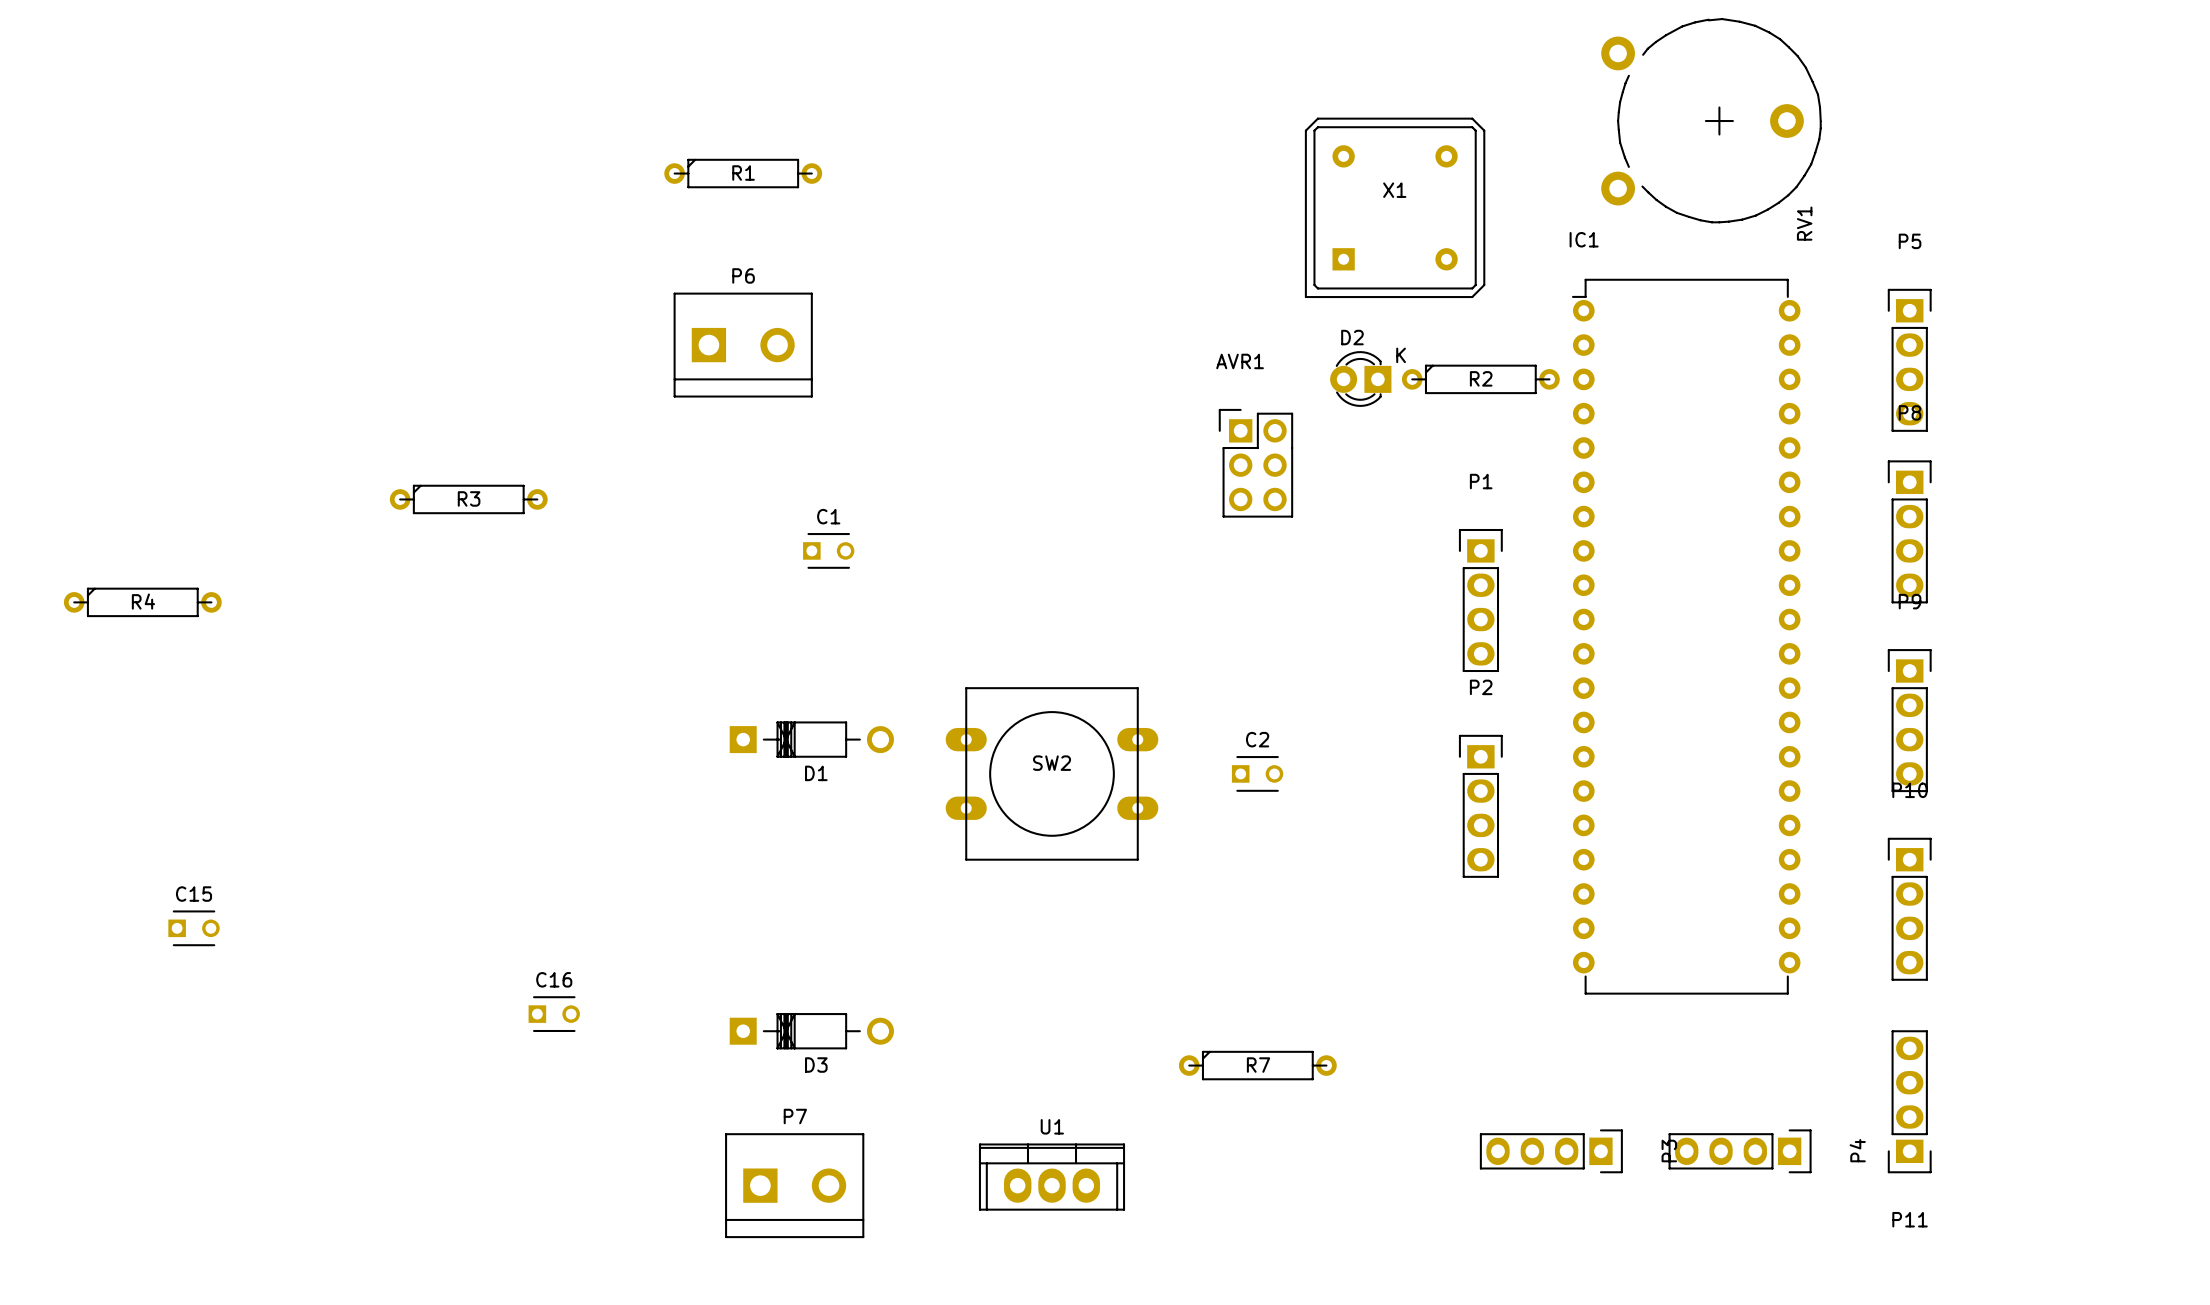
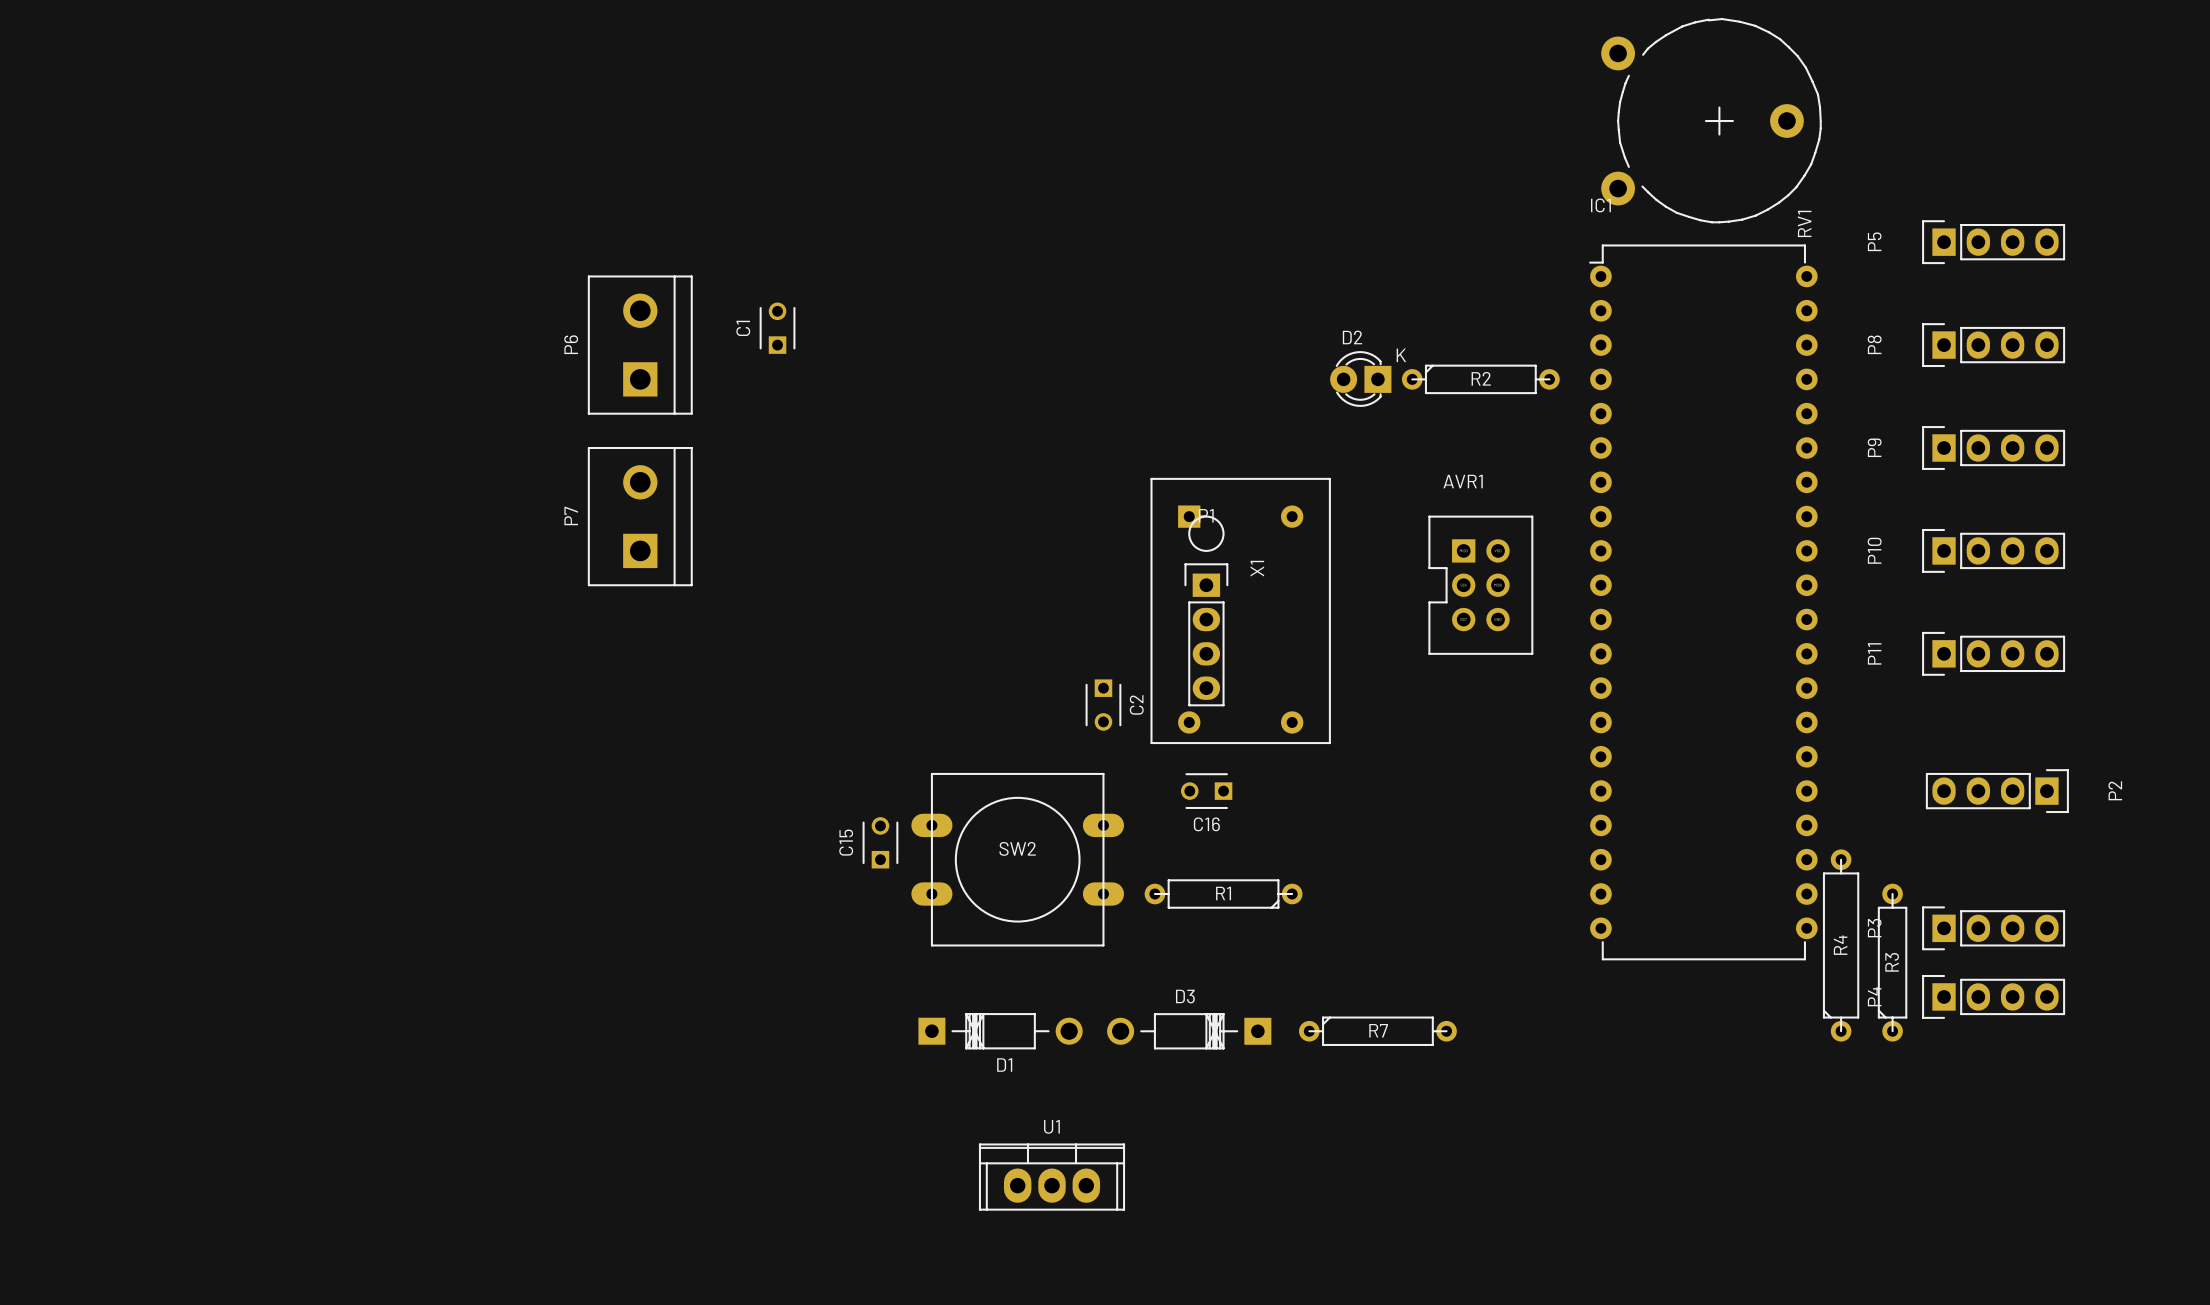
X1 footprint: [1304, 117, 1486, 299] -> [1150, 477, 1331, 745]
R1 rotation: 0° (743, 173) -> 180° (1223, 894)
R1 position: (743, 173) -> (1223, 894)
X1 name position: X1 (1394, 190) -> X1 (1257, 568)
P6 rotation: 0° (743, 345) -> 90° counterclockwise (640, 345)
P6 position: (743, 345) -> (640, 345)
P5 rotation: 0° (1909, 360) -> 90° counterclockwise (1993, 242)
P5 position: (1909, 360) -> (1993, 242)
AVR1 footprint: [1218, 408, 1294, 518] -> [1428, 515, 1534, 655]
R3 rotation: 0° (468, 499) -> 90° counterclockwise (1892, 962)
R3 position: (468, 499) -> (1892, 962)
P8 rotation: 0° (1909, 531) -> 90° counterclockwise (1993, 345)
P8 position: (1909, 531) -> (1993, 345)
C1 rotation: 0° (828, 550) -> 90° counterclockwise (777, 328)
C1 position: (828, 550) -> (777, 328)
R4 footprint: [63, 587, 222, 618] -> [1822, 849, 1860, 1042]
P1 position: (1480, 600) -> (1206, 634)
IC1 position: (1686, 636) -> (1703, 602)
P9 rotation: 0° (1909, 720) -> 90° counterclockwise (1993, 448)
P9 position: (1909, 720) -> (1993, 448)
D1 position: (811, 739) -> (1000, 1031)
SW2 position: (1052, 773) -> (1017, 859)
C2 rotation: 0° (1257, 773) -> 90° clockwise (1103, 705)
C2 position: (1257, 773) -> (1103, 705)
P2 rotation: 0° (1480, 806) -> 90° clockwise (1997, 791)
P2 position: (1480, 806) -> (1997, 791)
P10 rotation: 0° (1909, 909) -> 90° counterclockwise (1993, 550)
P10 position: (1909, 909) -> (1993, 550)
C15 rotation: 0° (194, 928) -> 90° counterclockwise (880, 842)
C15 position: (194, 928) -> (880, 842)
C16 rotation: 0° (554, 1014) -> 180° (1206, 791)
C16 position: (554, 1014) -> (1206, 791)
D3 rotation: 0° (811, 1031) -> 180° (1189, 1031)
D3 position: (811, 1031) -> (1189, 1031)
R7 position: (1257, 1065) -> (1377, 1031)
P11 rotation: 0° (1909, 1101) -> 90° clockwise (1993, 653)
P11 position: (1909, 1101) -> (1993, 653)
P3 rotation: 0° (1551, 1151) -> 180° (1993, 928)
P3 position: (1551, 1151) -> (1993, 928)
P4 rotation: 0° (1740, 1151) -> 180° (1993, 996)
P4 position: (1740, 1151) -> (1993, 996)
P7 rotation: 0° (794, 1185) -> 90° counterclockwise (640, 516)
P7 position: (794, 1185) -> (640, 516)

